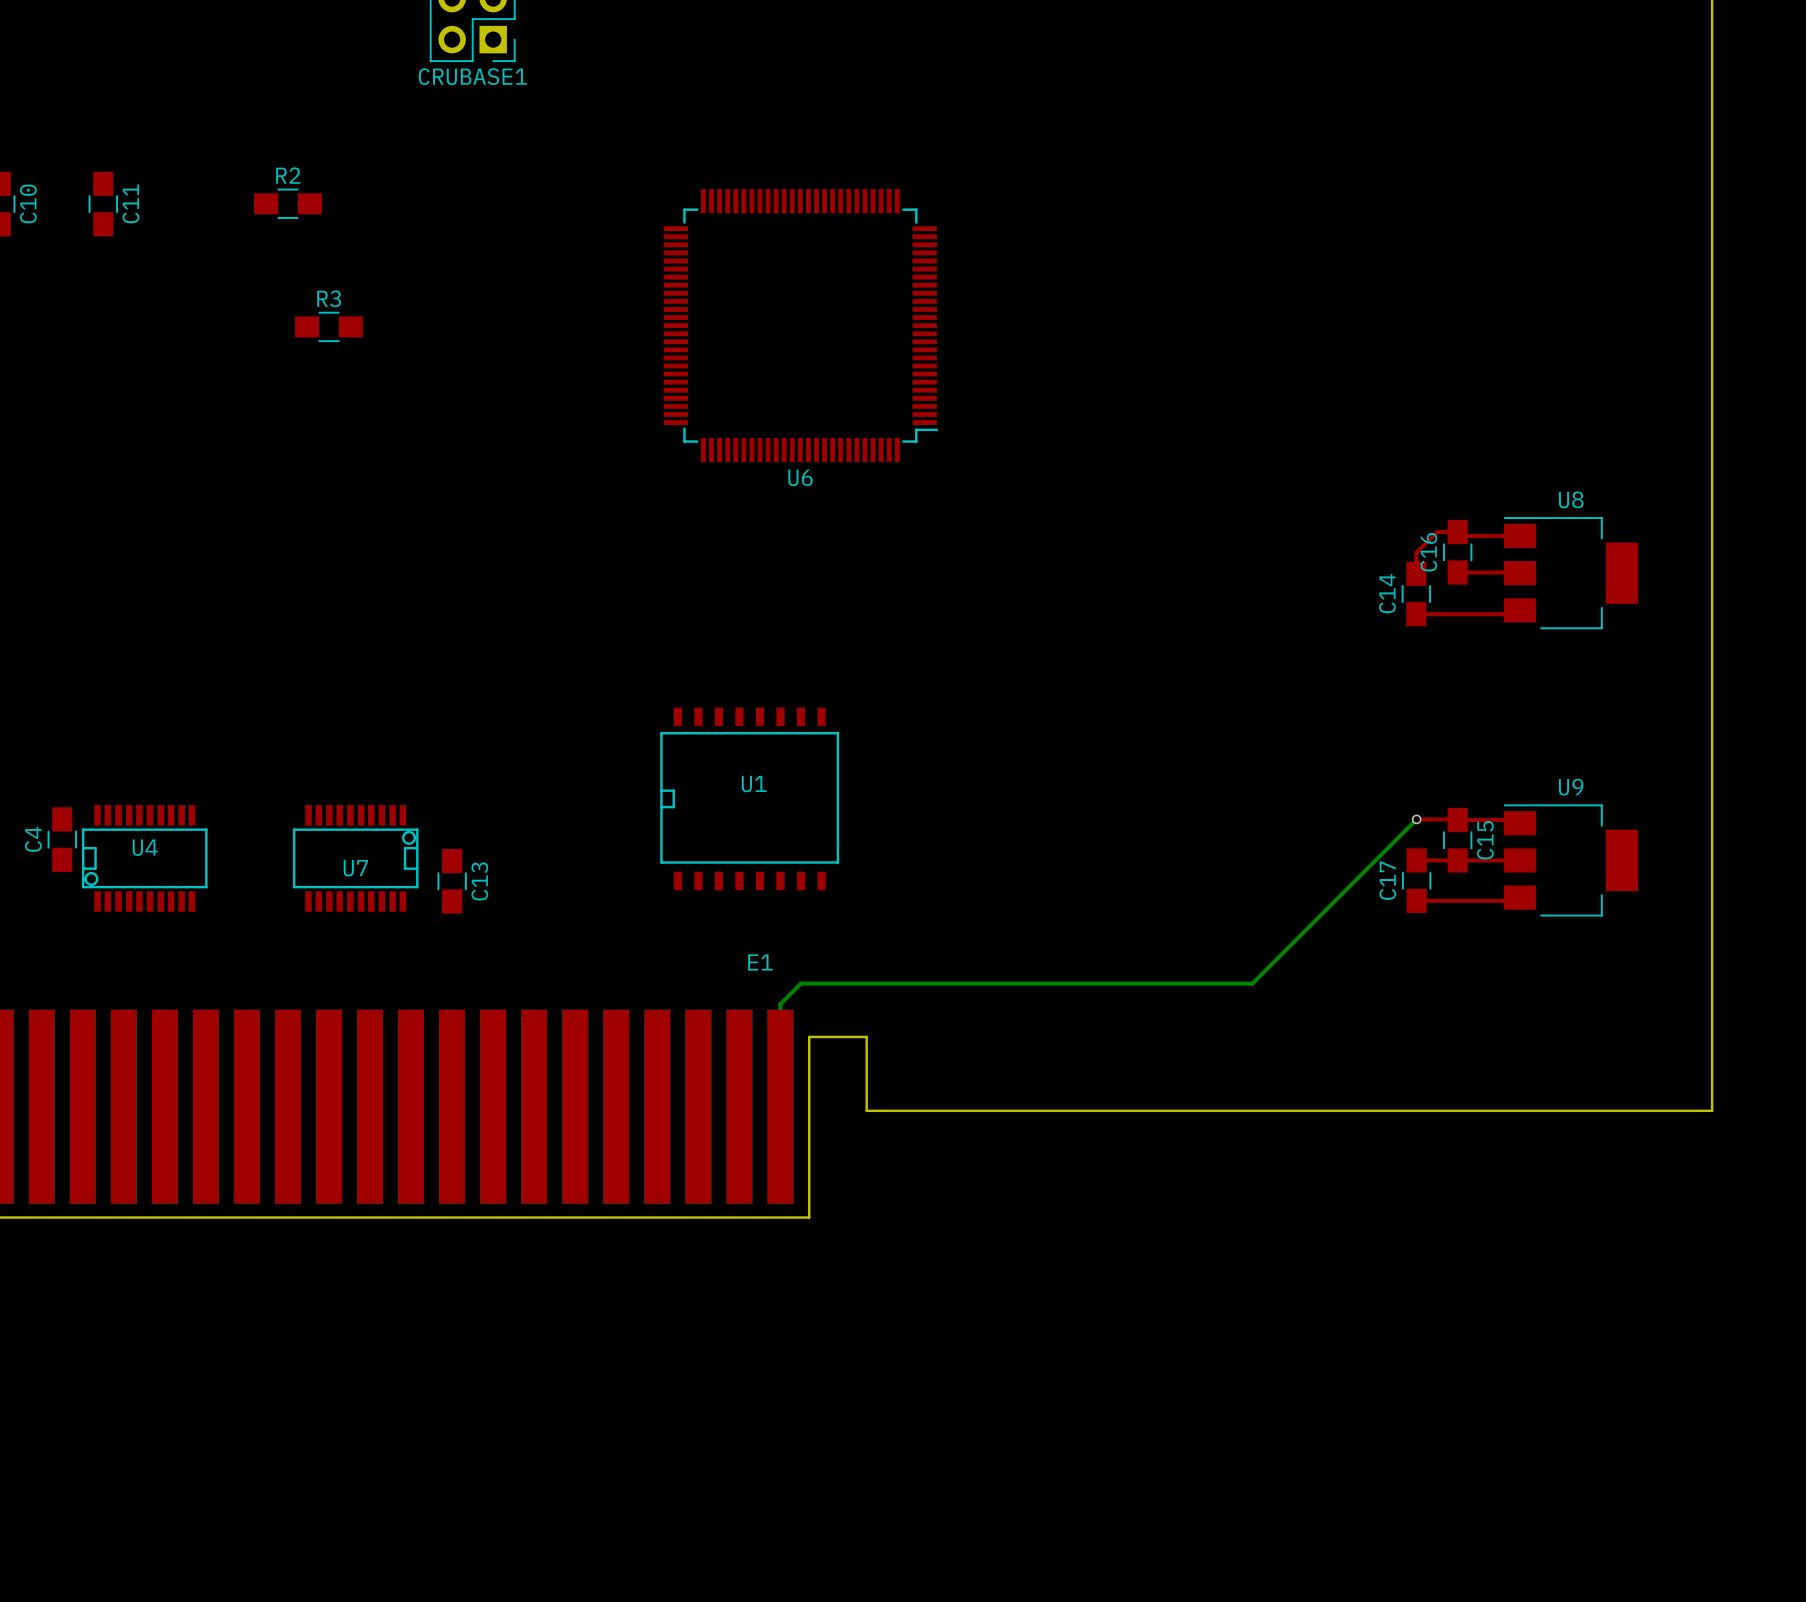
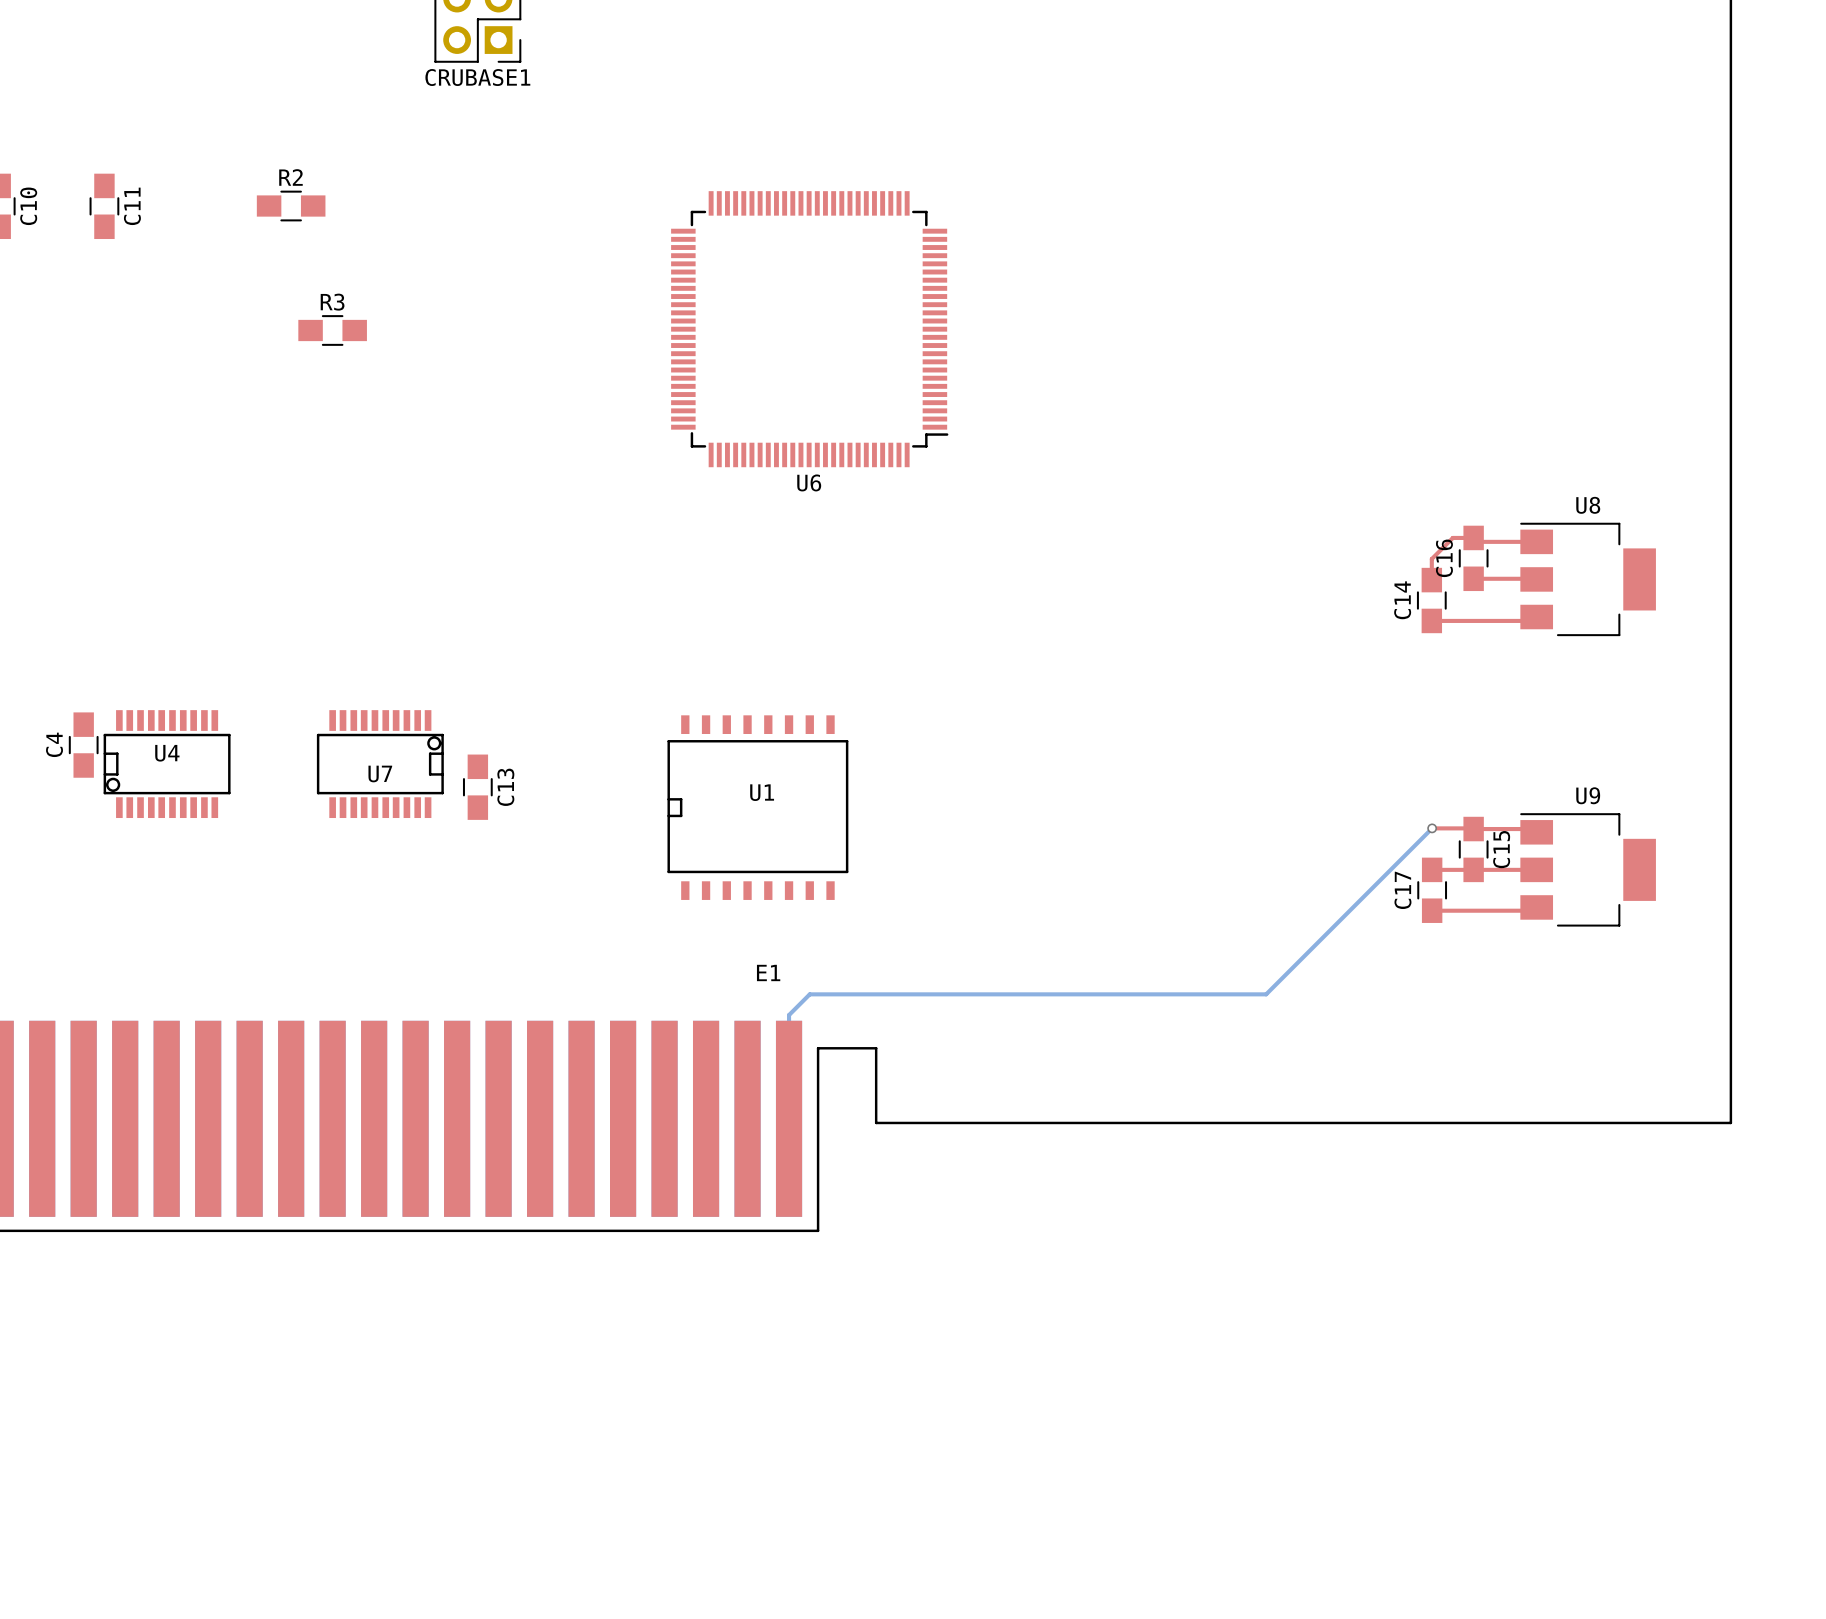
C4 position: (62, 839) -> (83, 745)
U4 position: (144, 858) -> (167, 764)
U7 position: (355, 858) -> (380, 764)
C13 position: (452, 881) -> (477, 787)

